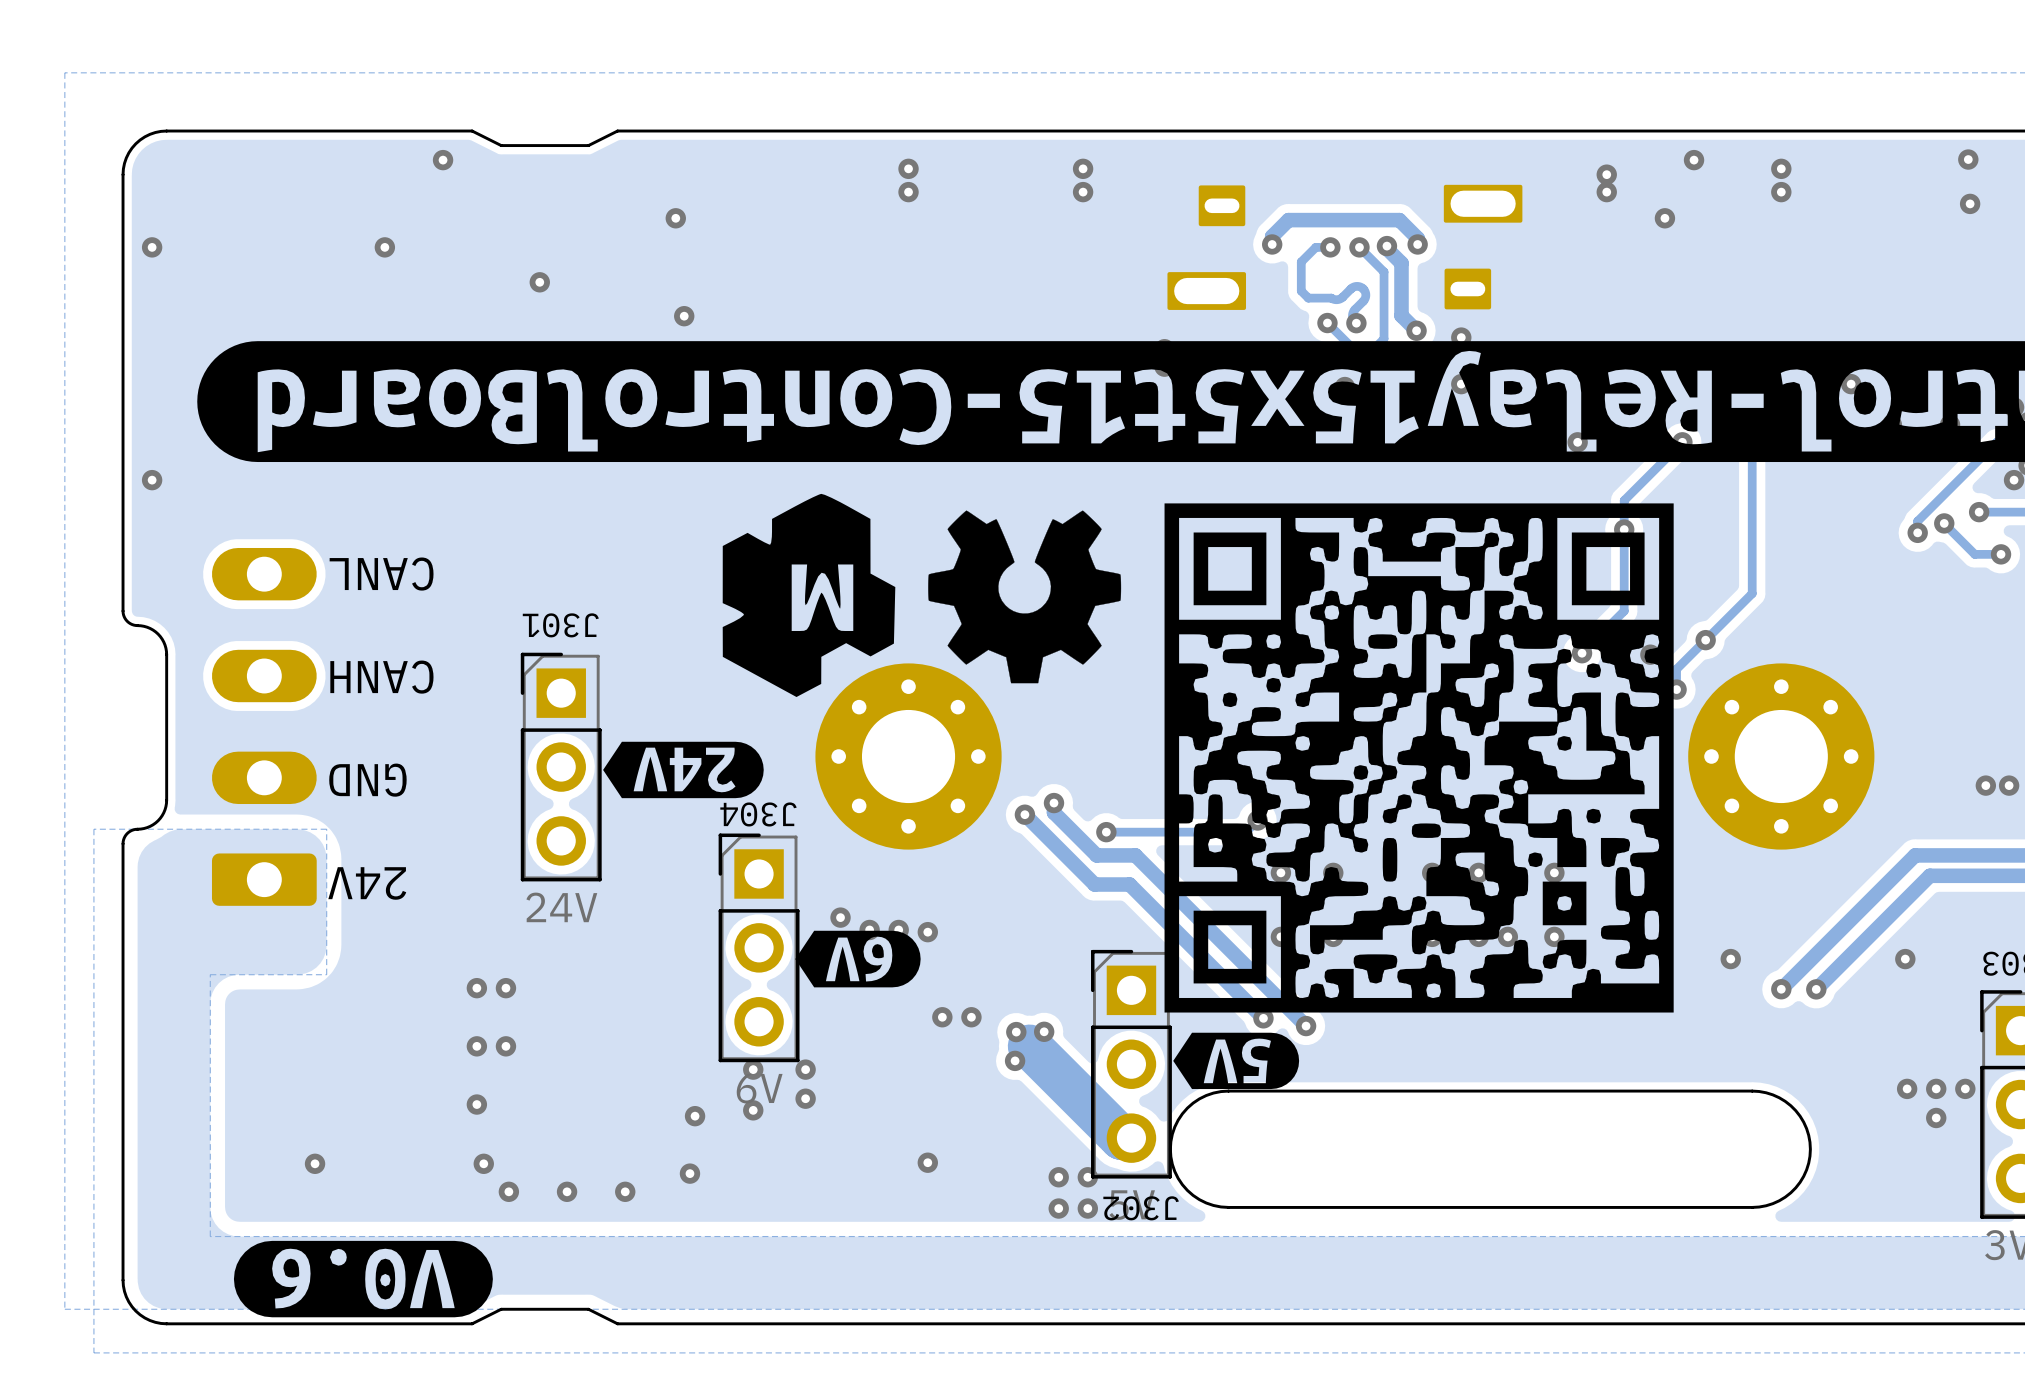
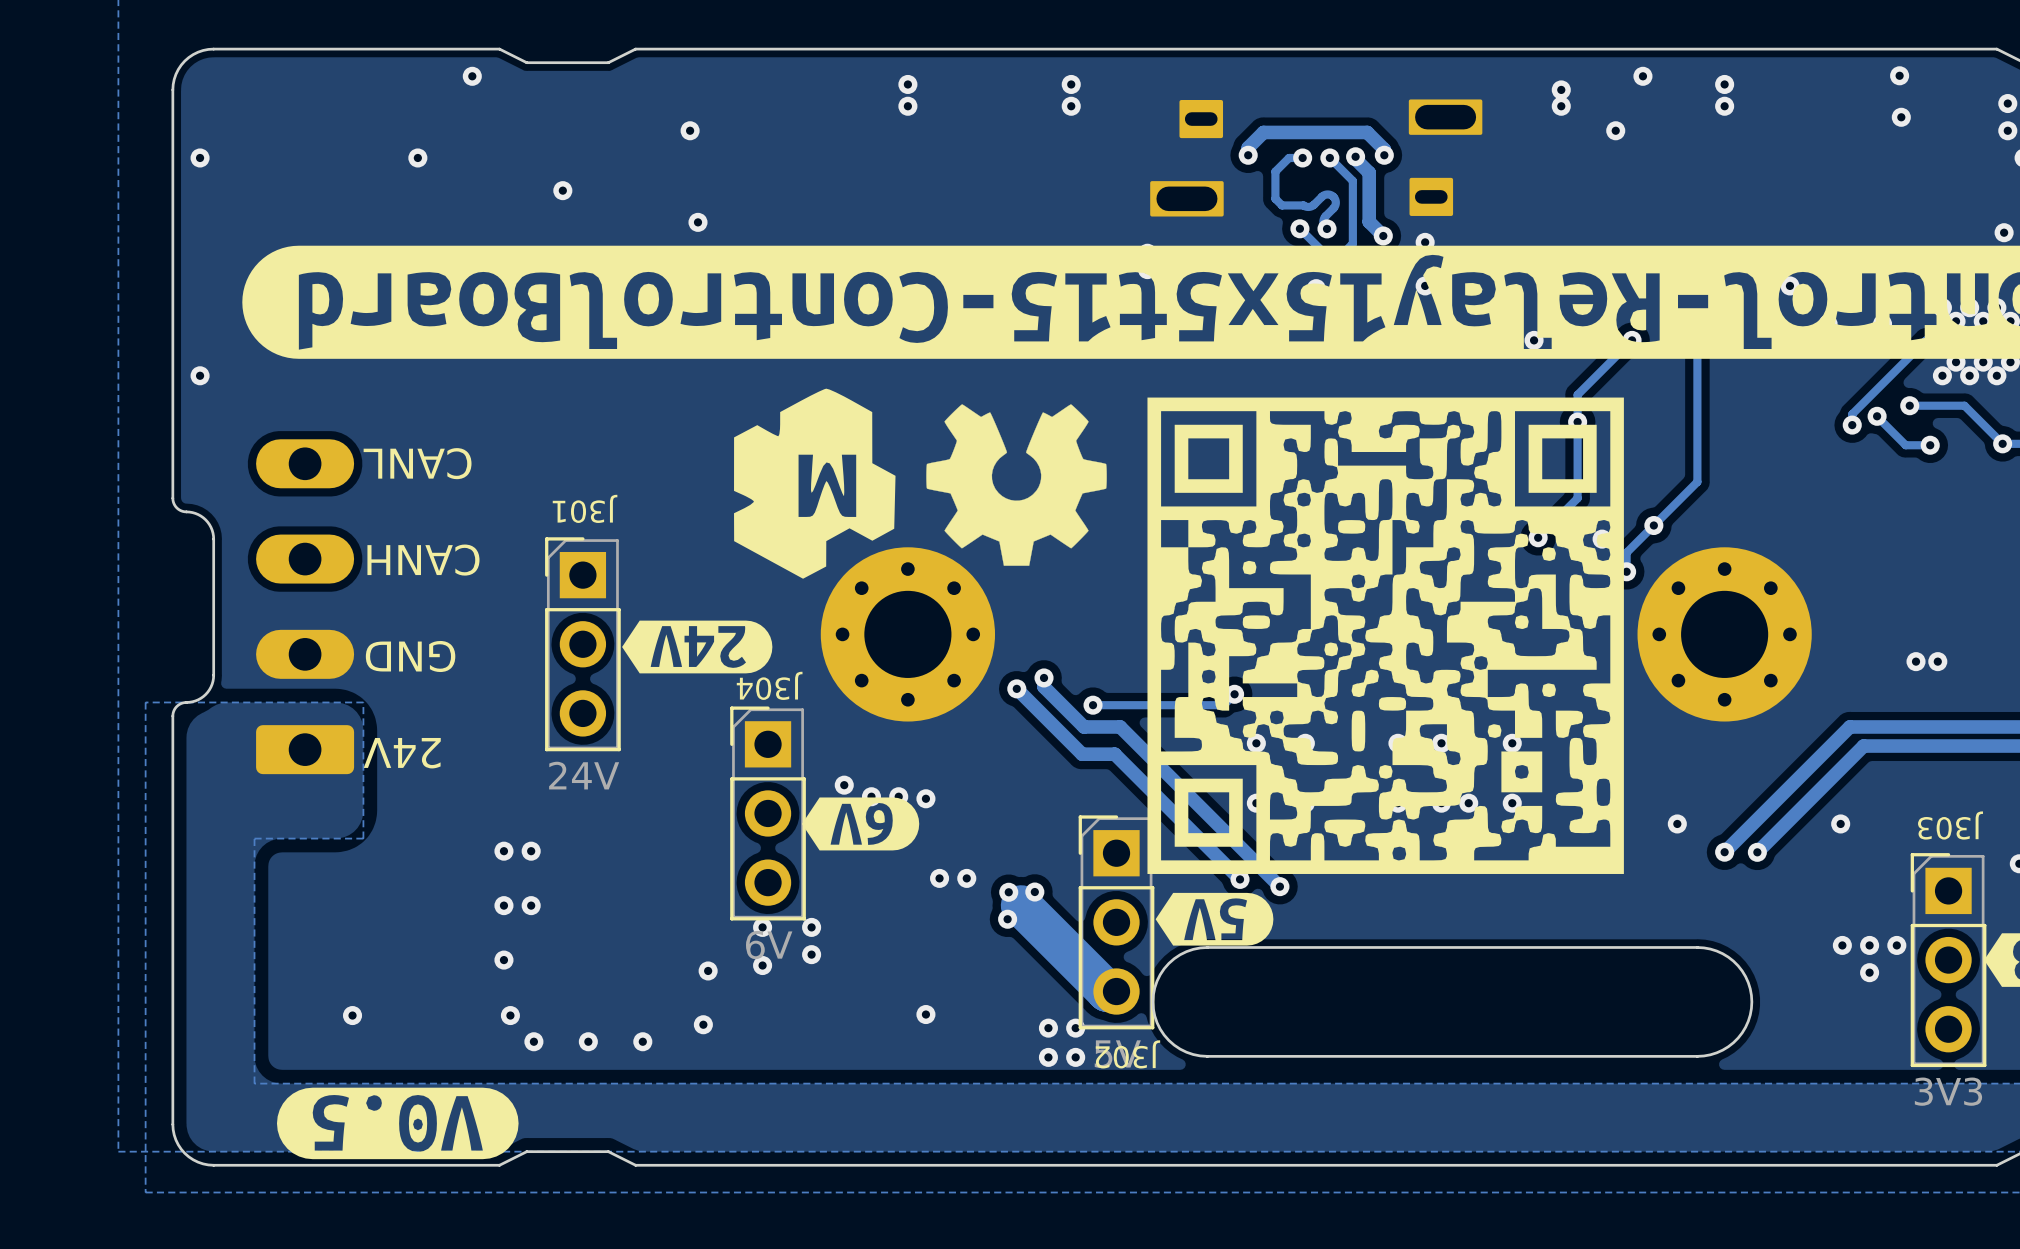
drawing shape: [1164, 503, 1674, 1013] -> [1147, 397, 1624, 874]
drawing shape: [233, 1240, 493, 1318] -> [276, 1087, 519, 1160]

